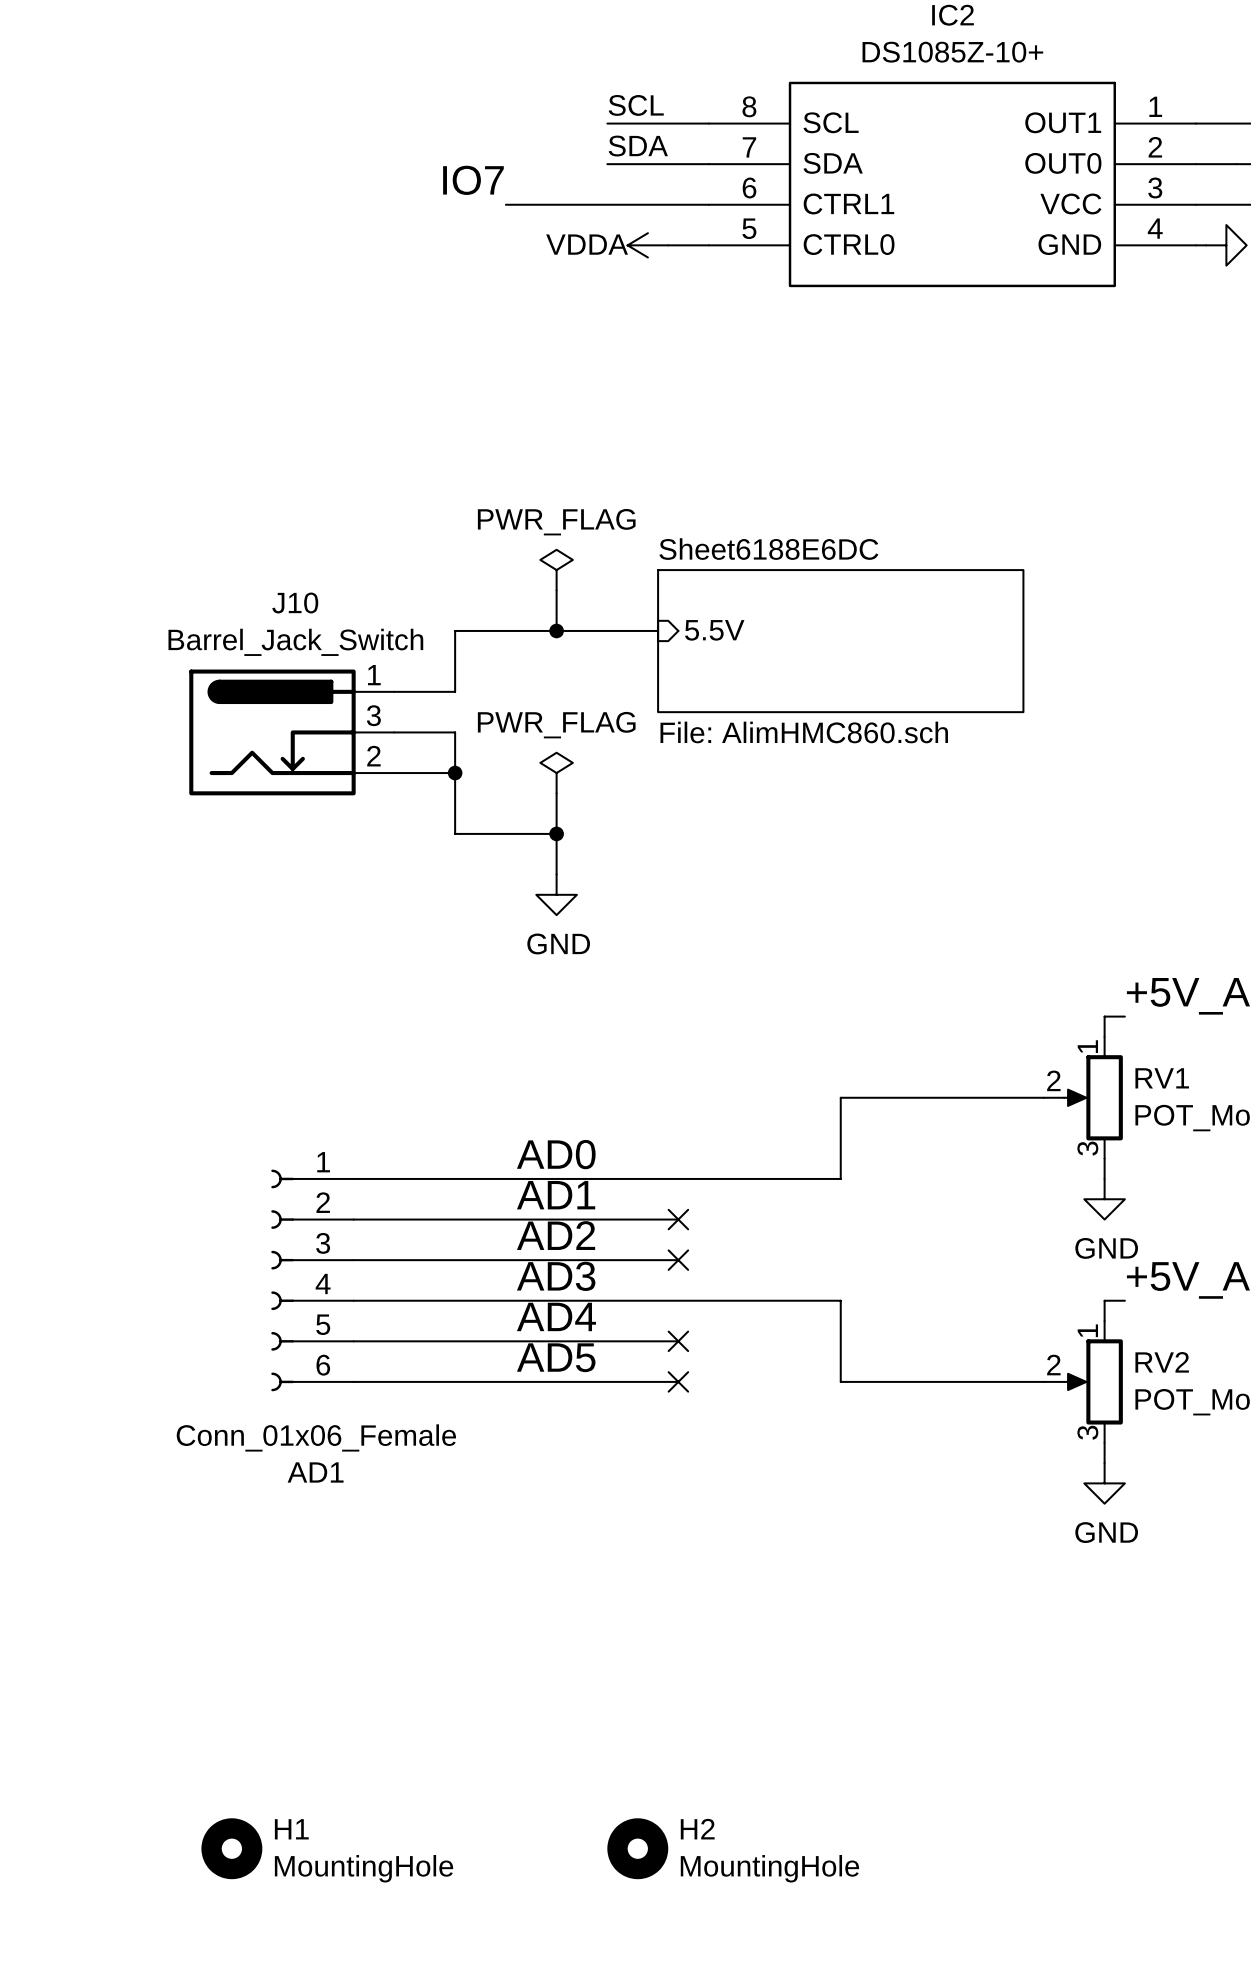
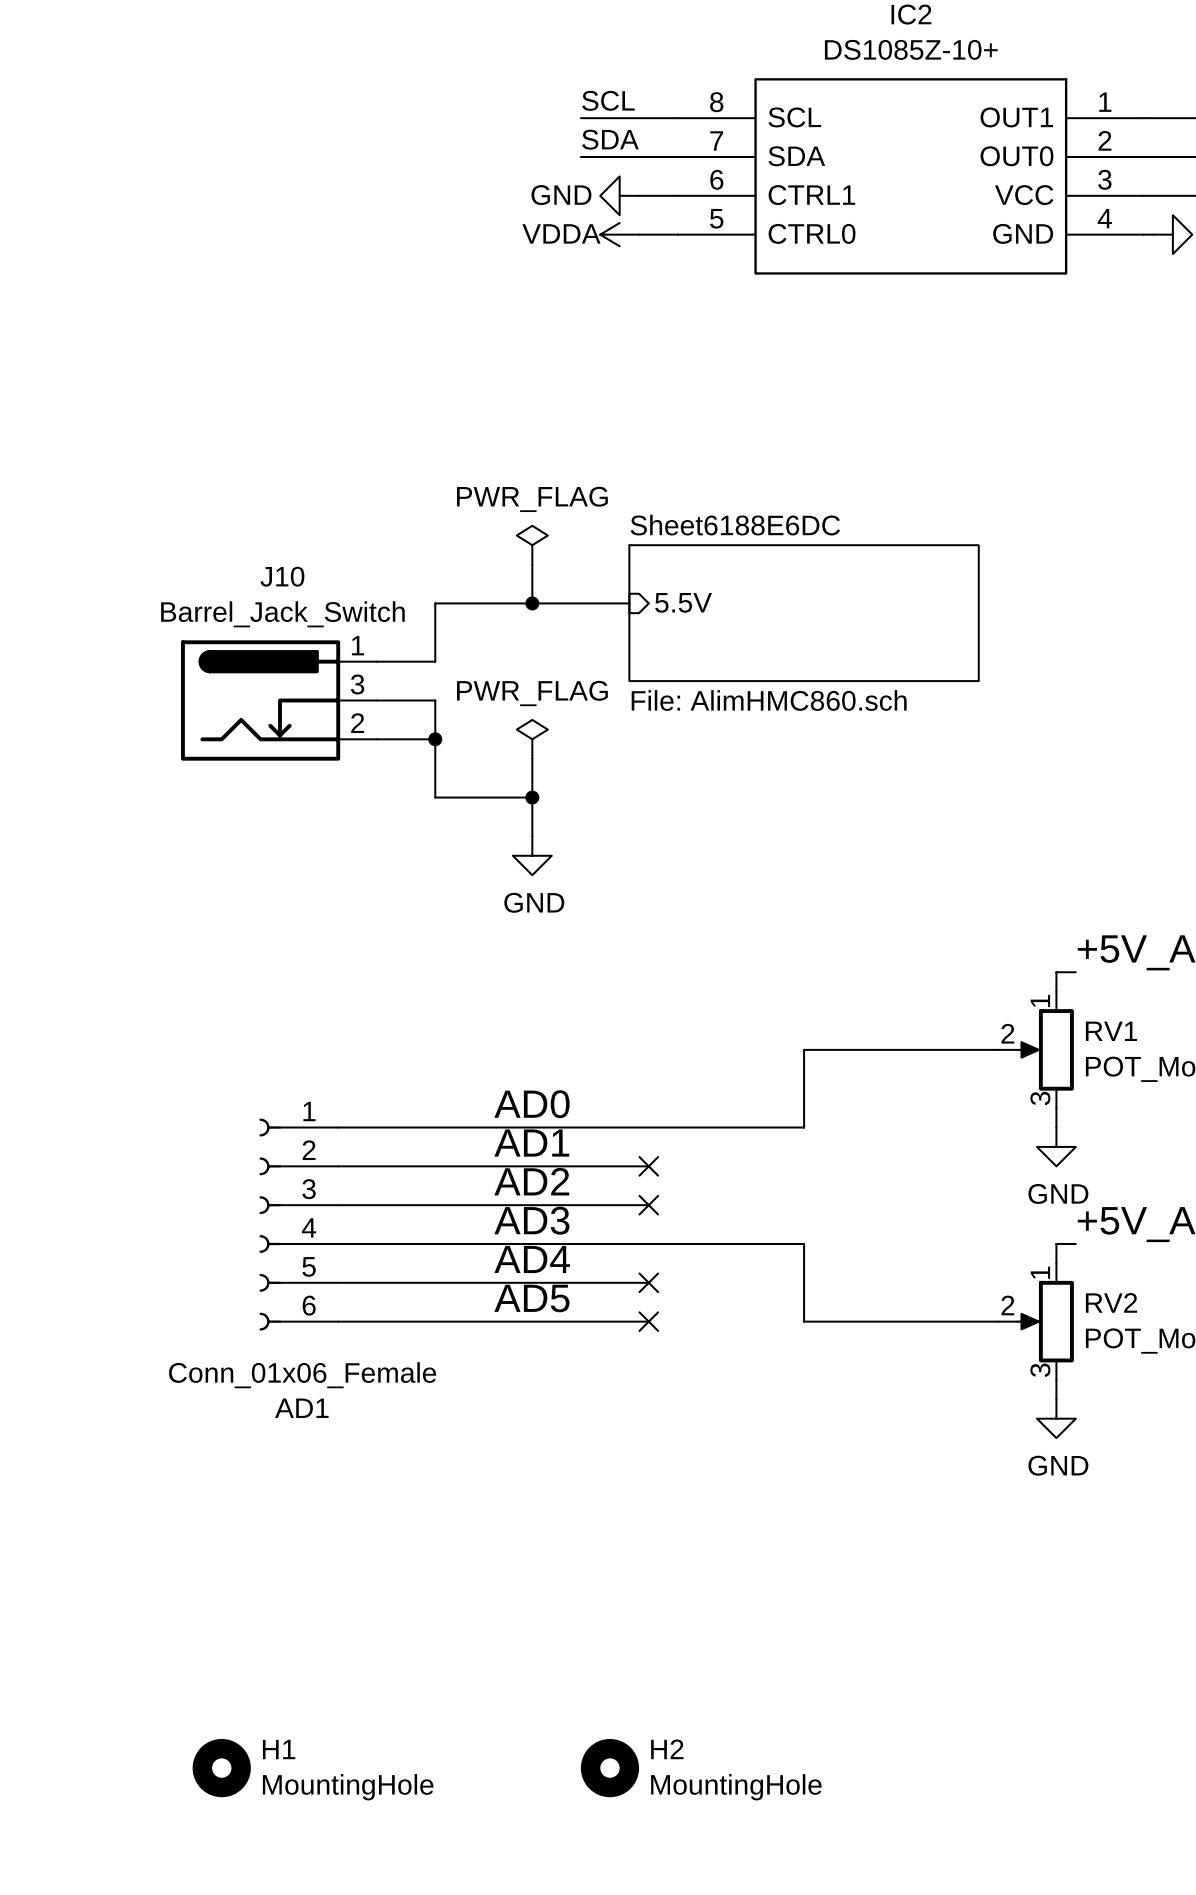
label: IO7 (473, 180) -> none
wire: (505, 204) (668, 204) -> none
power symbol: none -> GND (619, 195)

